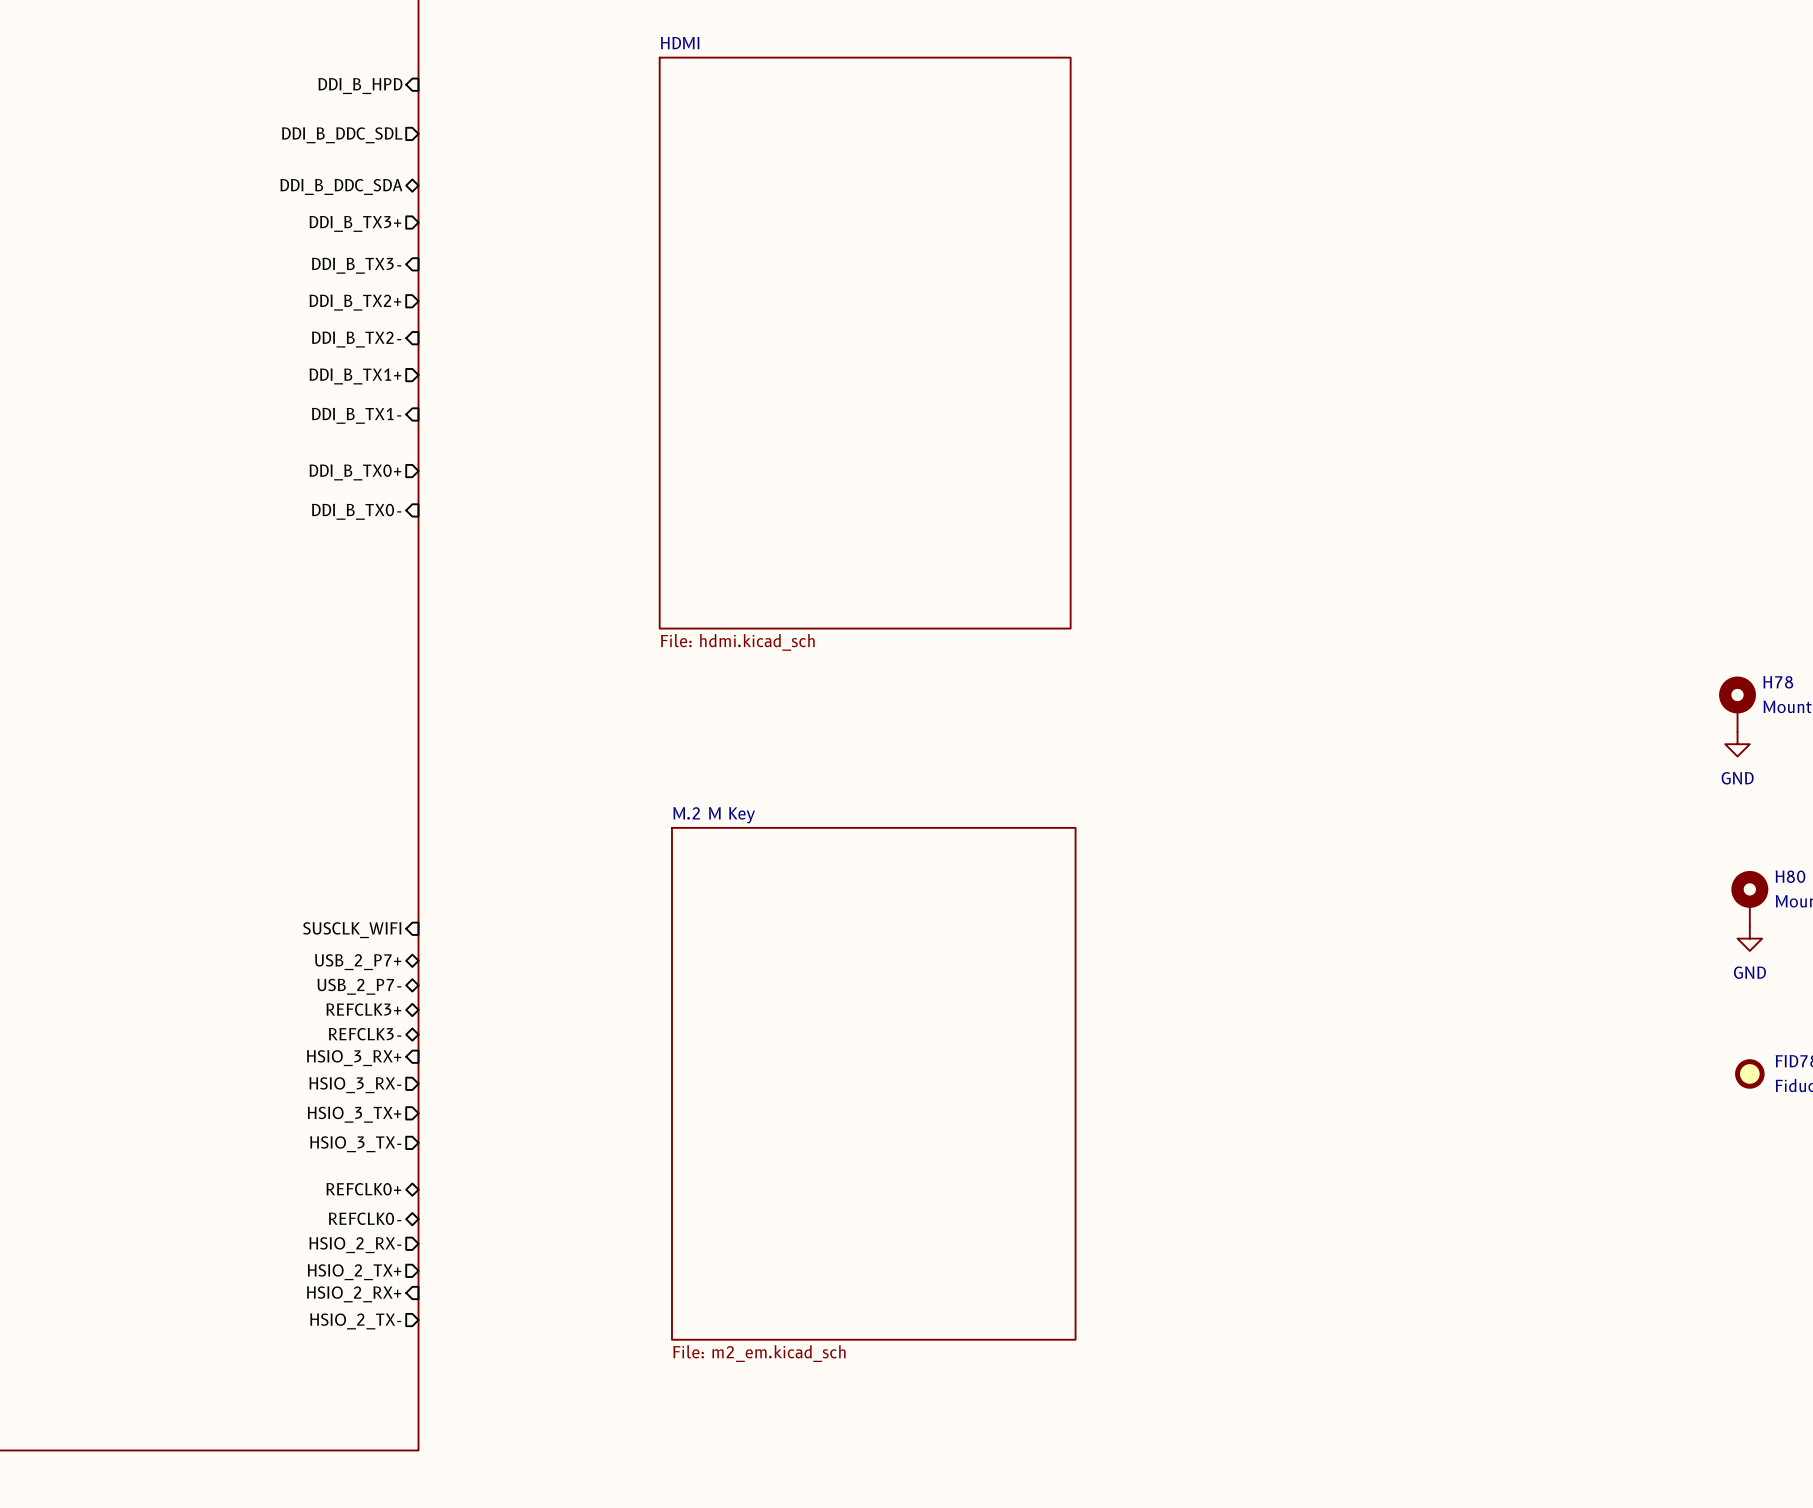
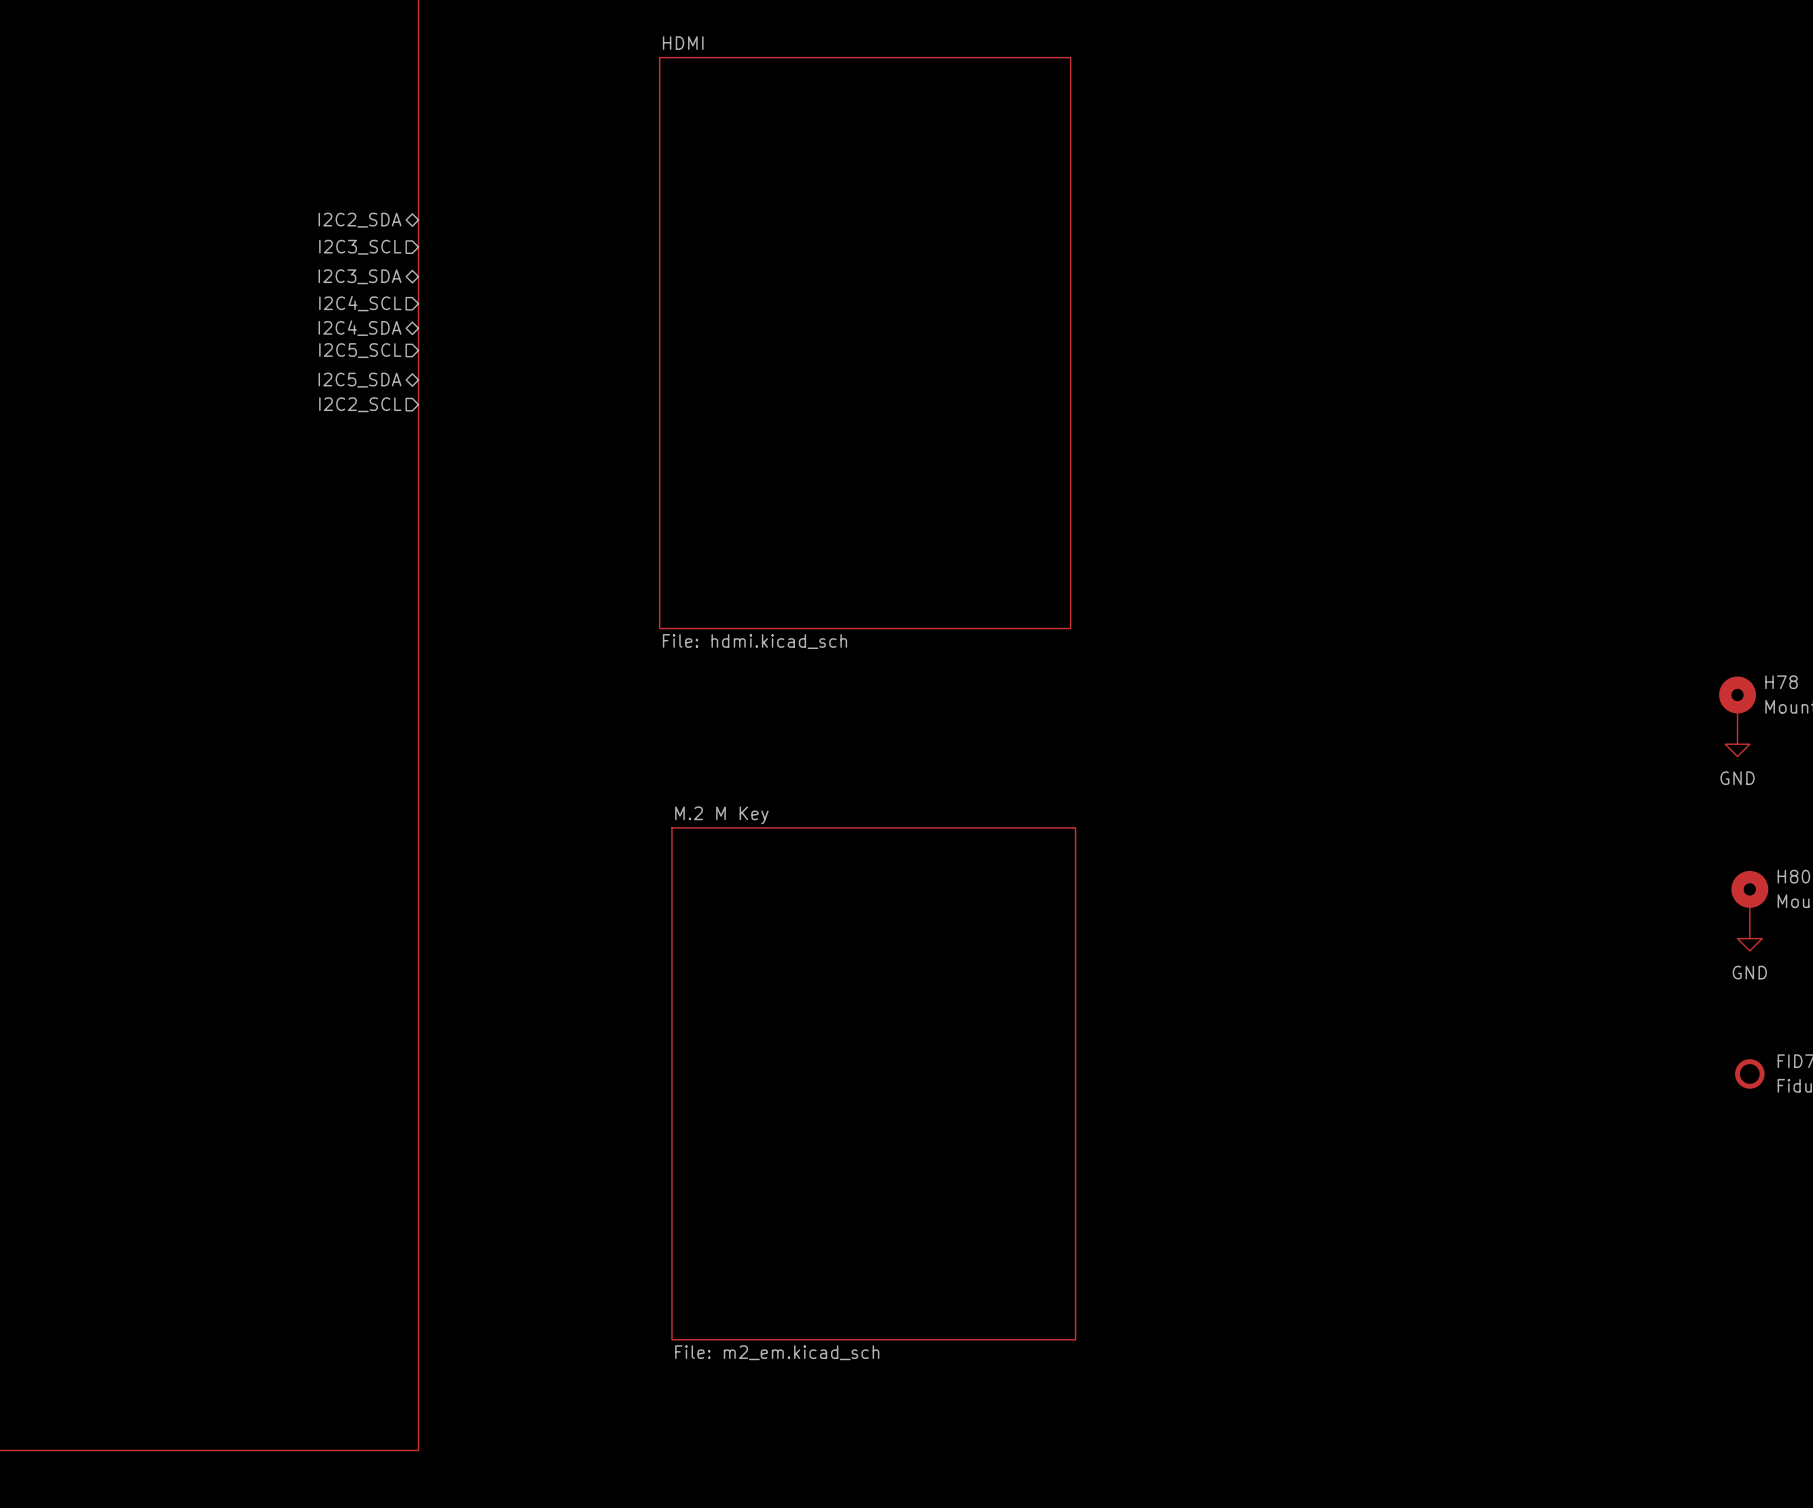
sheet pin: DDI_B_HPD (360, 86) -> none
sheet pin: DDI_B_DDC_SDL (342, 135) -> none
sheet pin: DDI_B_DDC_SDA (341, 186) -> none
sheet pin shape: output (355, 223) -> bidirectional (360, 220)
sheet pin: DDI_B_TX3+ (355, 223) -> I2C2_SDA (360, 220)
sheet pin: none -> I2C3_SCL (360, 247)
sheet pin: DDI_B_TX3- (356, 265) -> none
sheet pin: none -> I2C3_SDA (360, 276)
sheet pin: DDI_B_TX2+ (355, 302) -> I2C4_SCL (360, 303)
sheet pin: none -> I2C4_SDA (360, 328)
sheet pin: DDI_B_TX2- (356, 339) -> none
sheet pin: none -> I2C5_SCL (360, 350)
sheet pin shape: output (355, 376) -> bidirectional (360, 380)
sheet pin: DDI_B_TX1+ (355, 376) -> I2C5_SDA (360, 380)
sheet pin: none -> I2C2_SCL (360, 404)
sheet pin: DDI_B_TX1- (356, 415) -> none
sheet pin: DDI_B_TX0+ (355, 472) -> none
sheet pin: DDI_B_TX0- (356, 511) -> none
sheet pin: SUSCLK_WIFI (352, 930) -> none
sheet pin: USB_2_P7+ (358, 962) -> none
sheet pin: USB_2_P7- (359, 986) -> none
sheet pin: REFCLK3+ (363, 1009) -> none
sheet pin: REFCLK3- (365, 1034) -> none
sheet pin: HSIO_3_RX+ (354, 1058) -> none
sheet pin: HSIO_3_RX- (355, 1085) -> none
sheet pin: HSIO_3_TX+ (354, 1114) -> none
sheet pin: HSIO_3_TX- (355, 1144) -> none
sheet pin: REFCLK0+ (363, 1189) -> none
sheet pin: REFCLK0- (365, 1218) -> none
sheet pin: HSIO_2_RX- (355, 1245) -> none
sheet pin: HSIO_2_TX+ (354, 1272) -> none
sheet pin: HSIO_2_RX+ (354, 1294) -> none
sheet pin: HSIO_2_TX- (355, 1321) -> none

